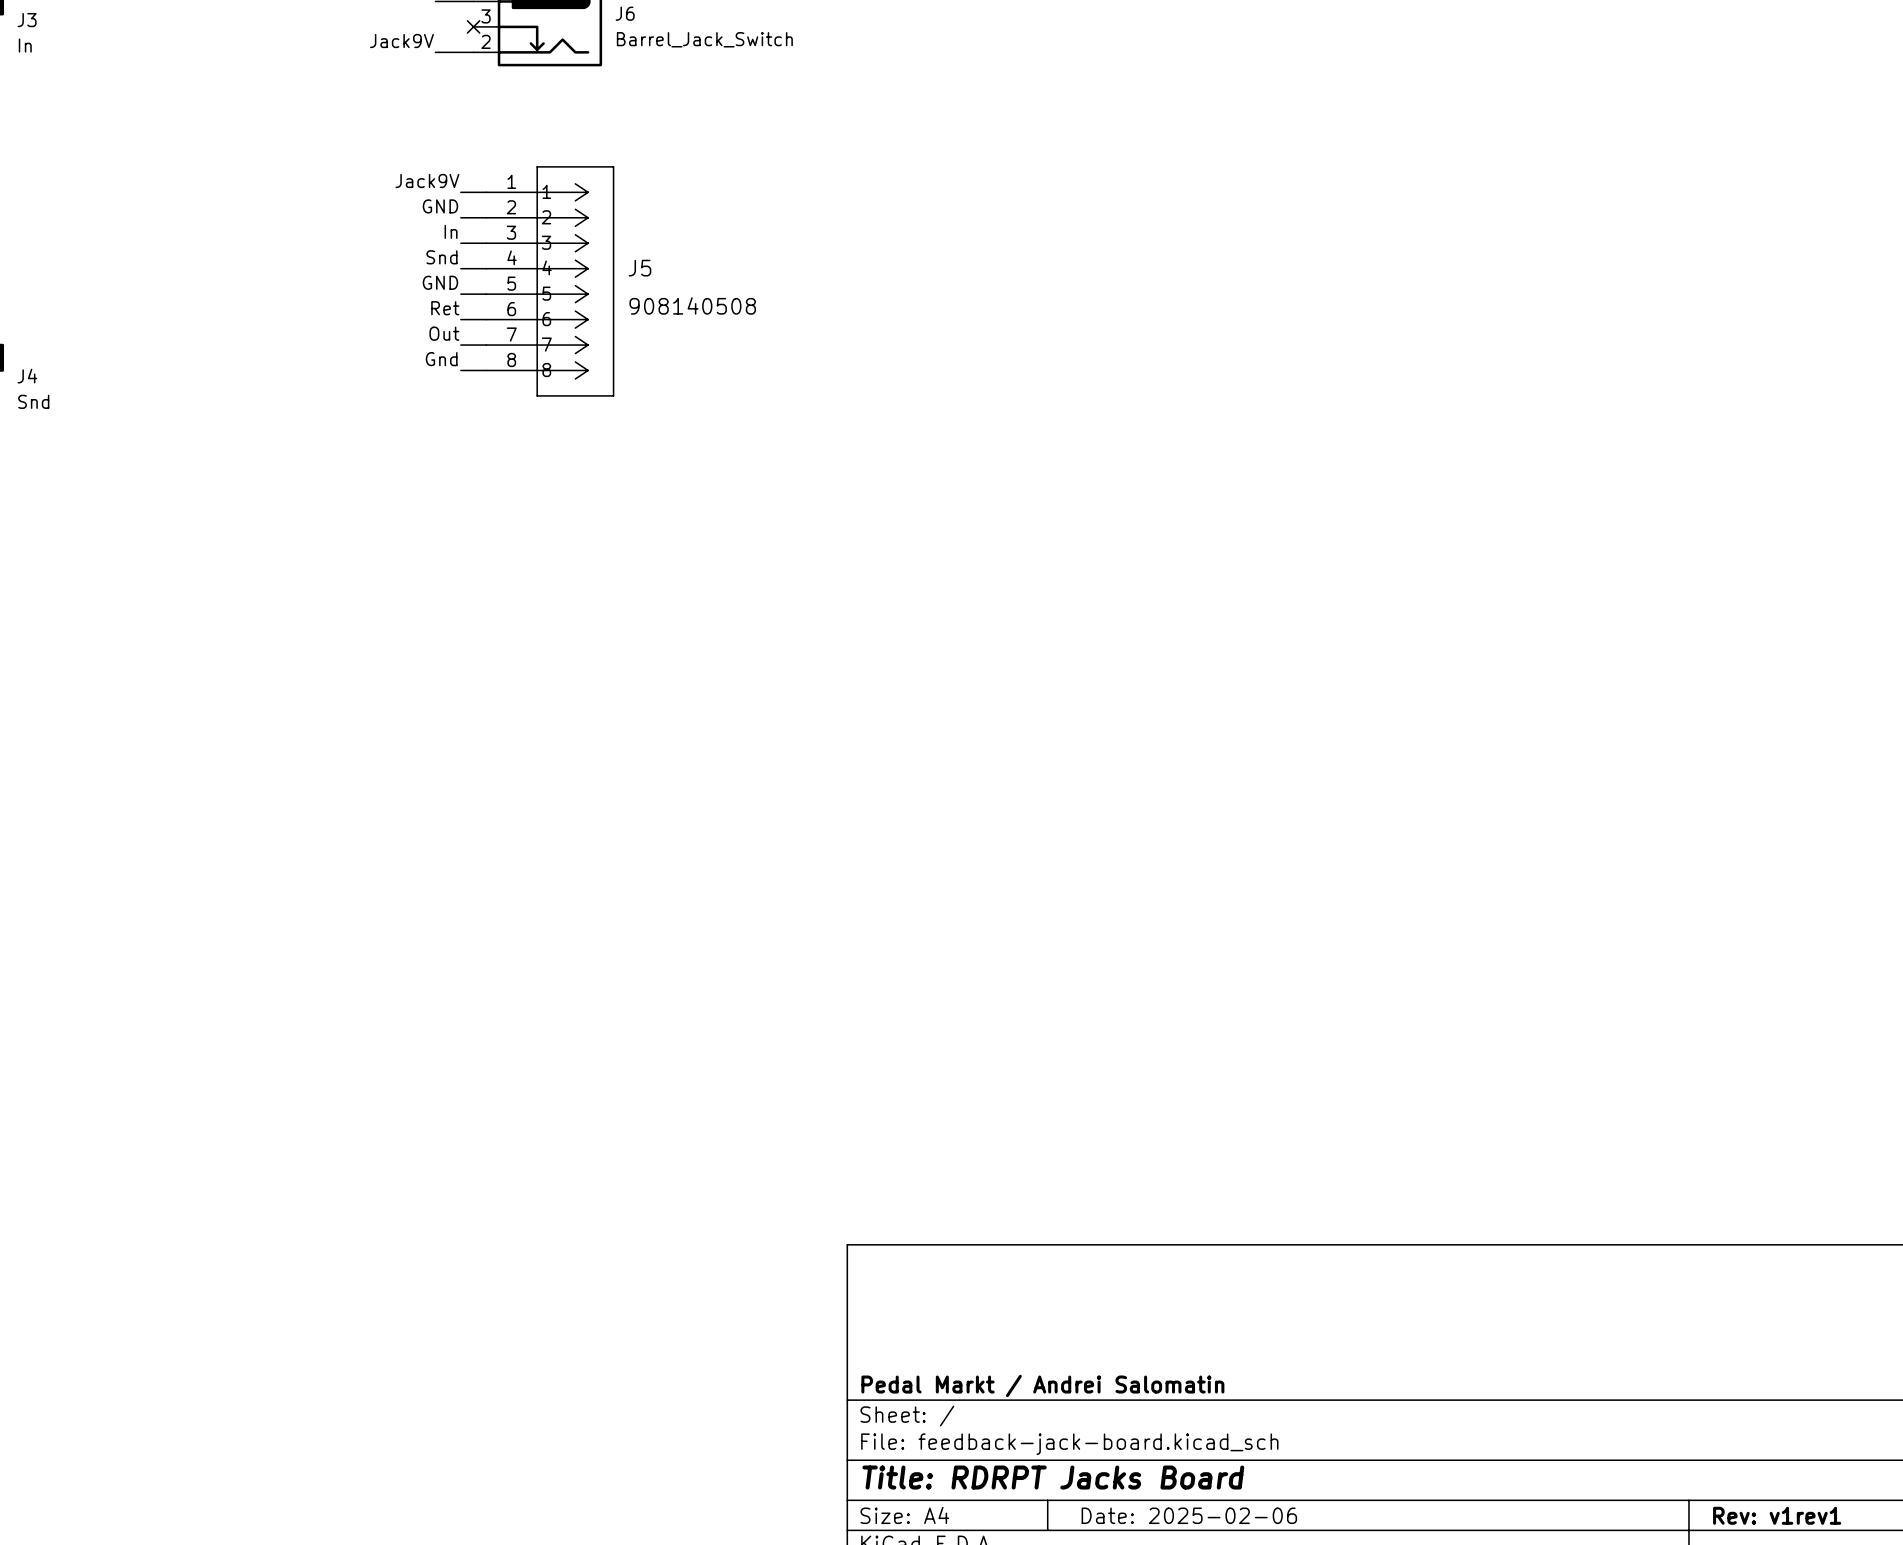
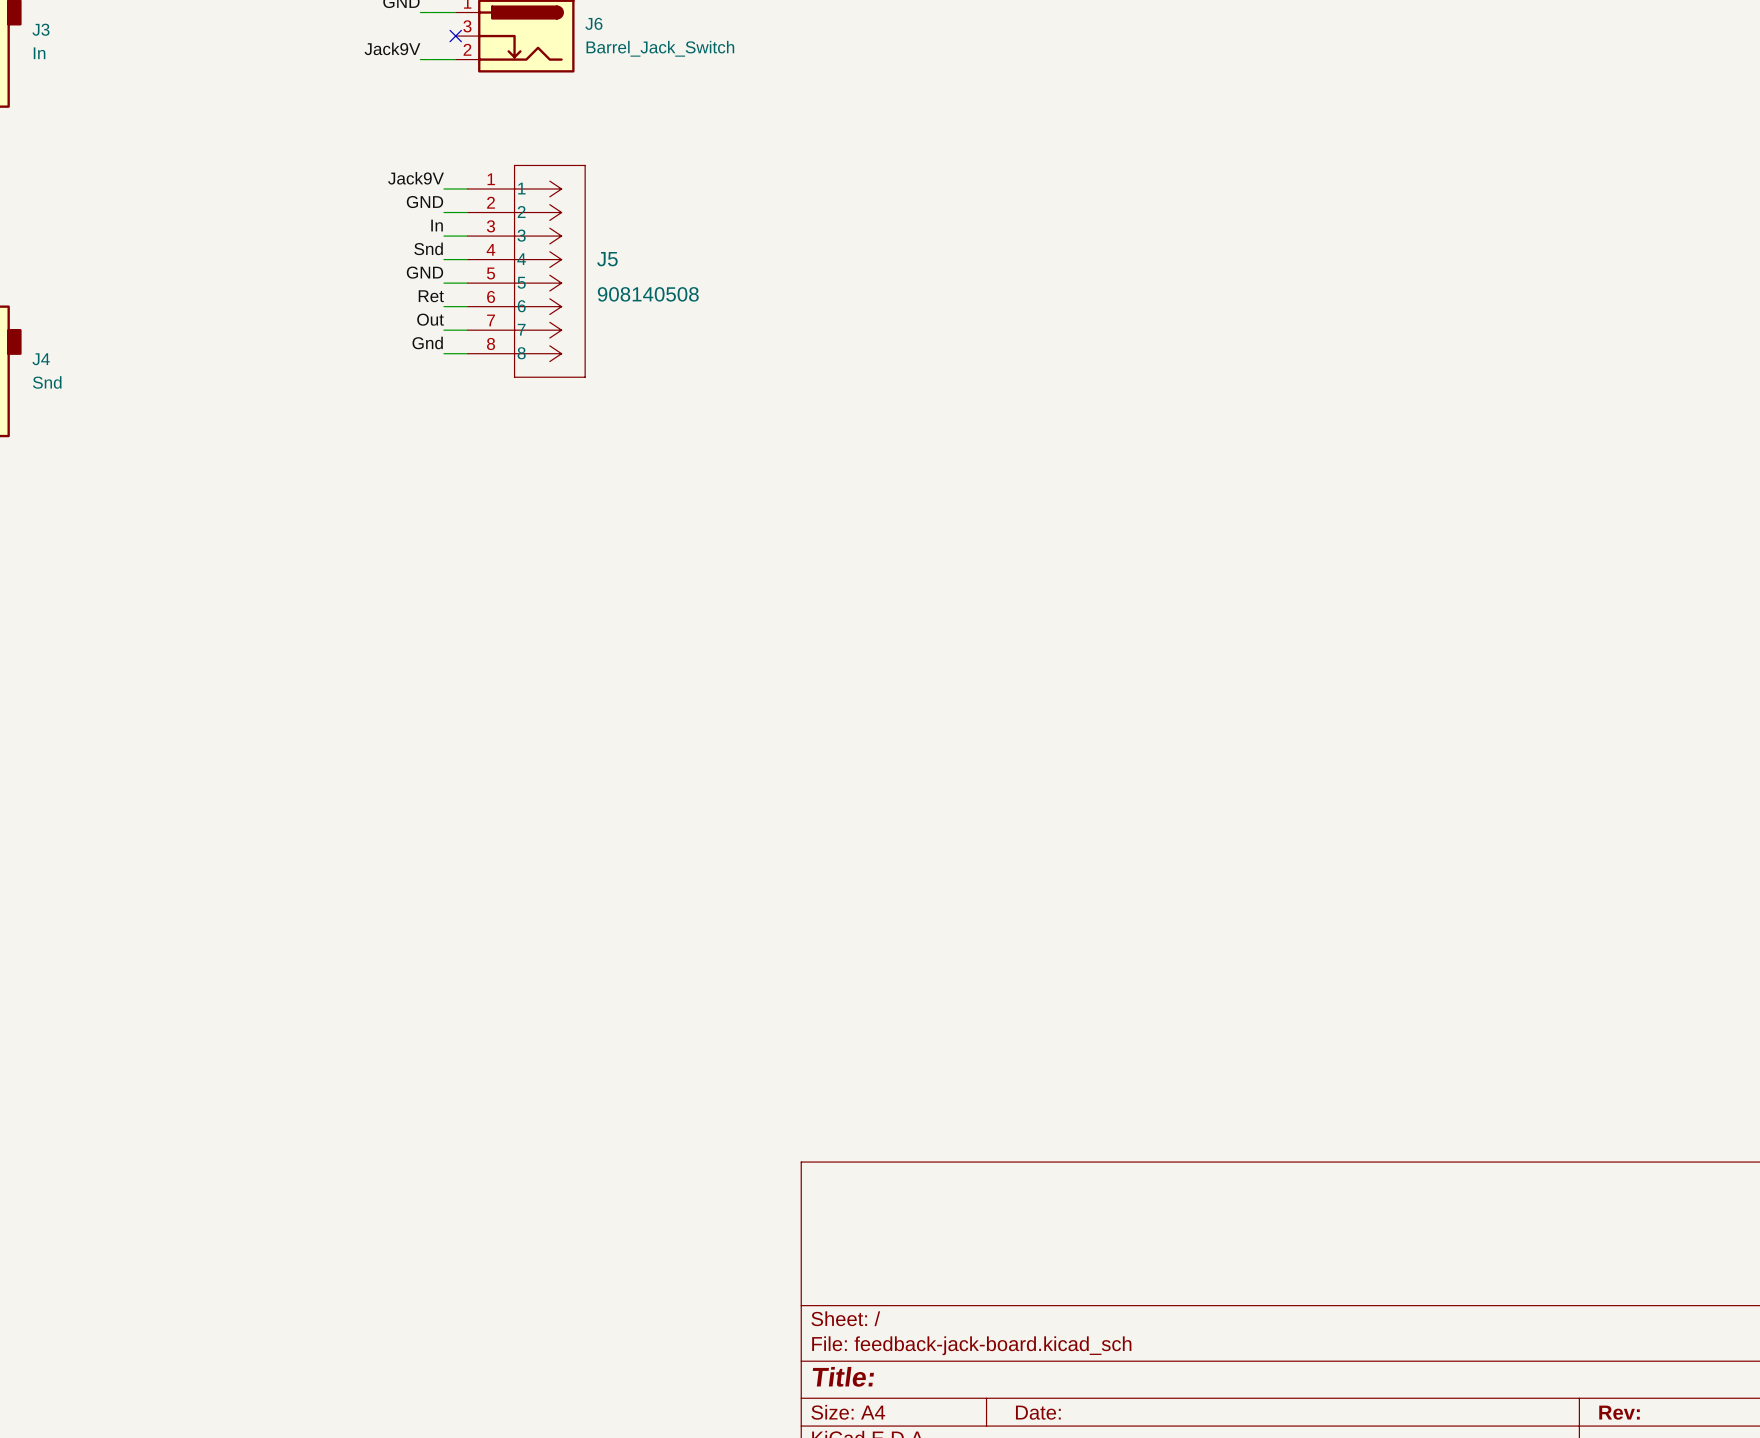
title block: Pedal Markt / Andrei Salomatin (1042, 1385) -> none
title block: Title: RDRPT Jacks Board (1053, 1477) -> Title: (843, 1376)
title block: Date: 2025-02-06 (1189, 1515) -> Date: (1038, 1412)
title block: Rev: v1rev1 (1777, 1515) -> Rev: (1619, 1412)

